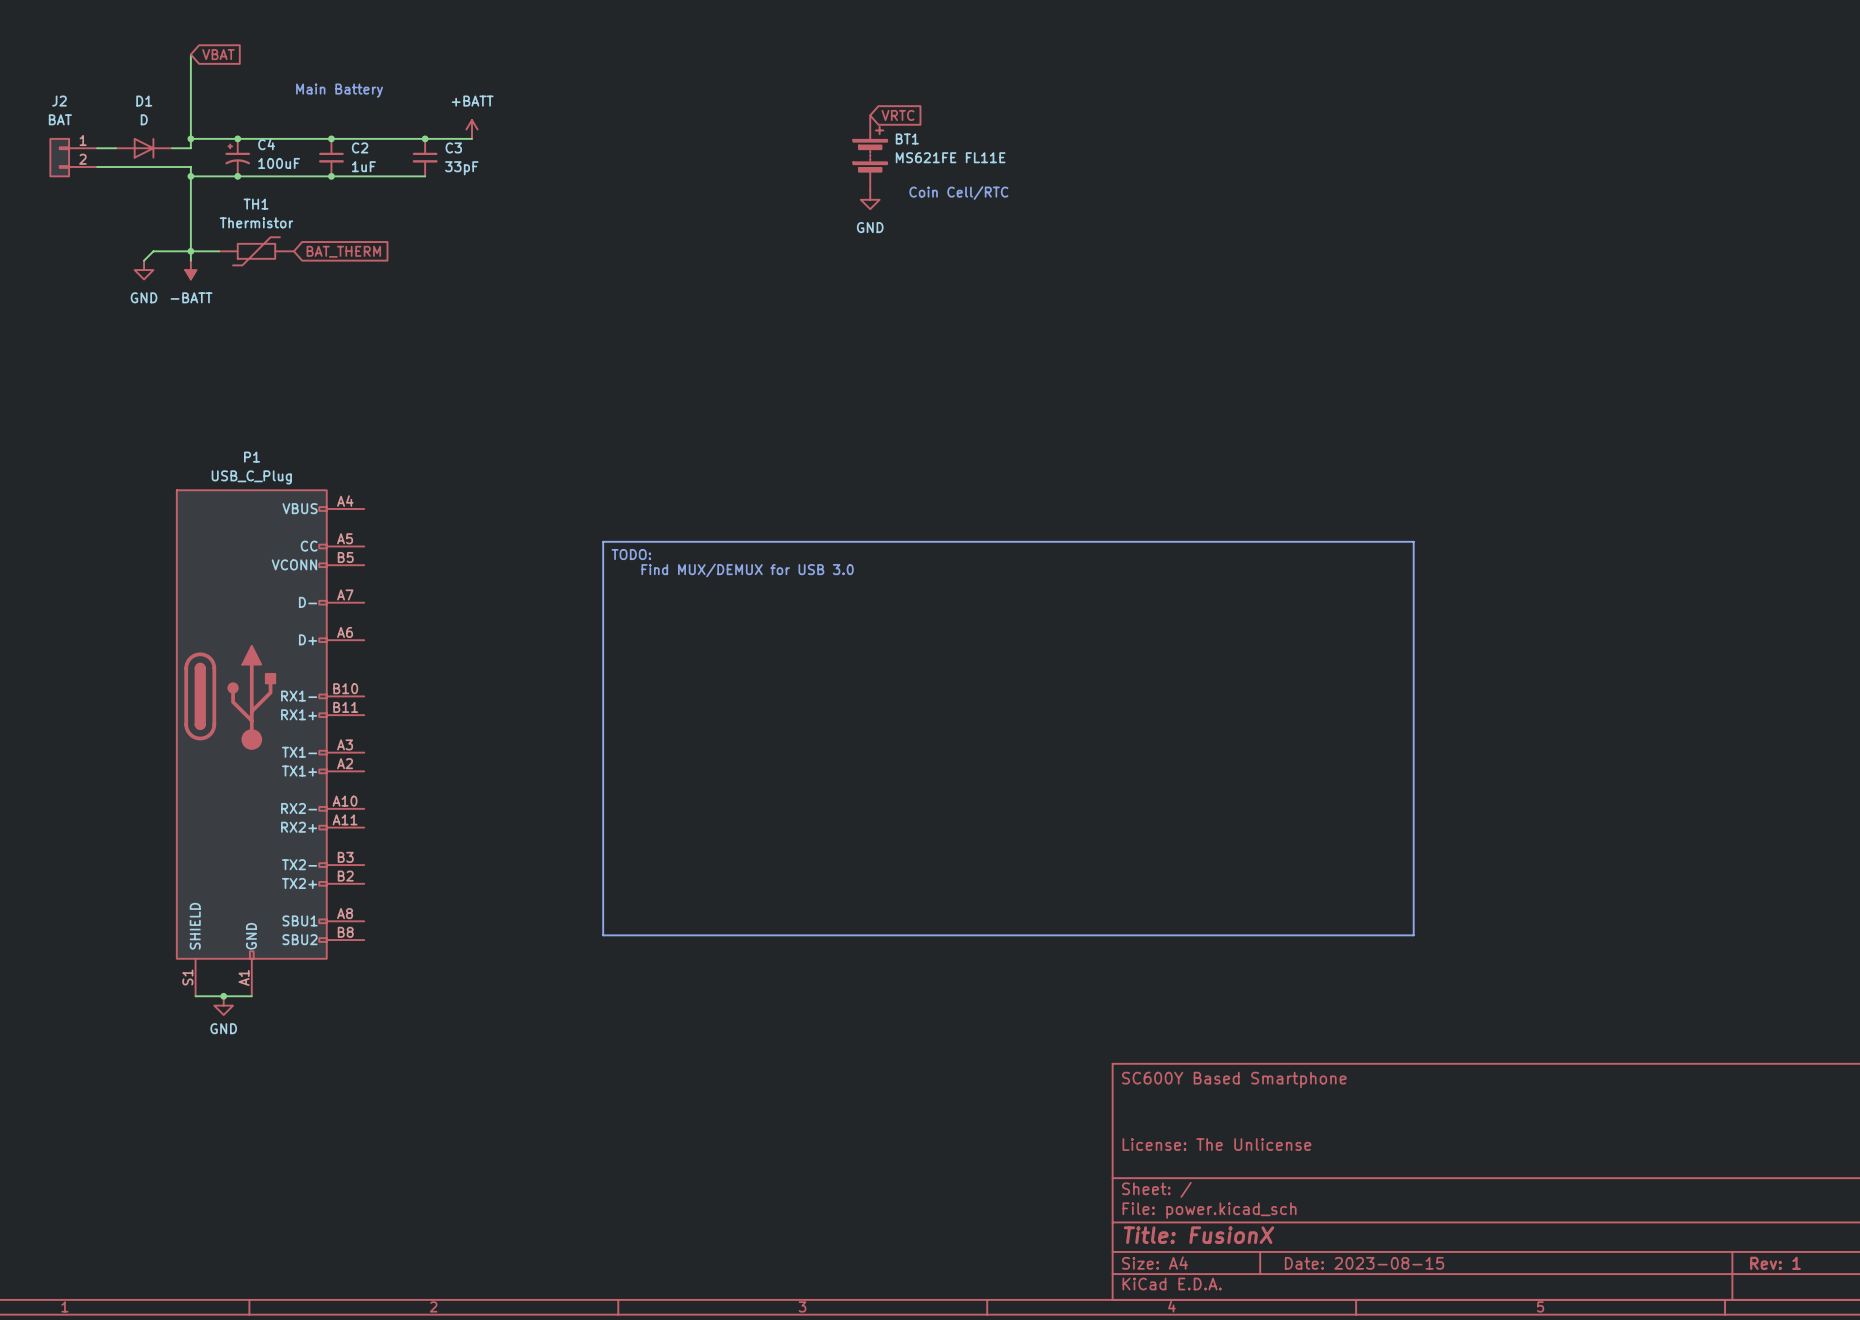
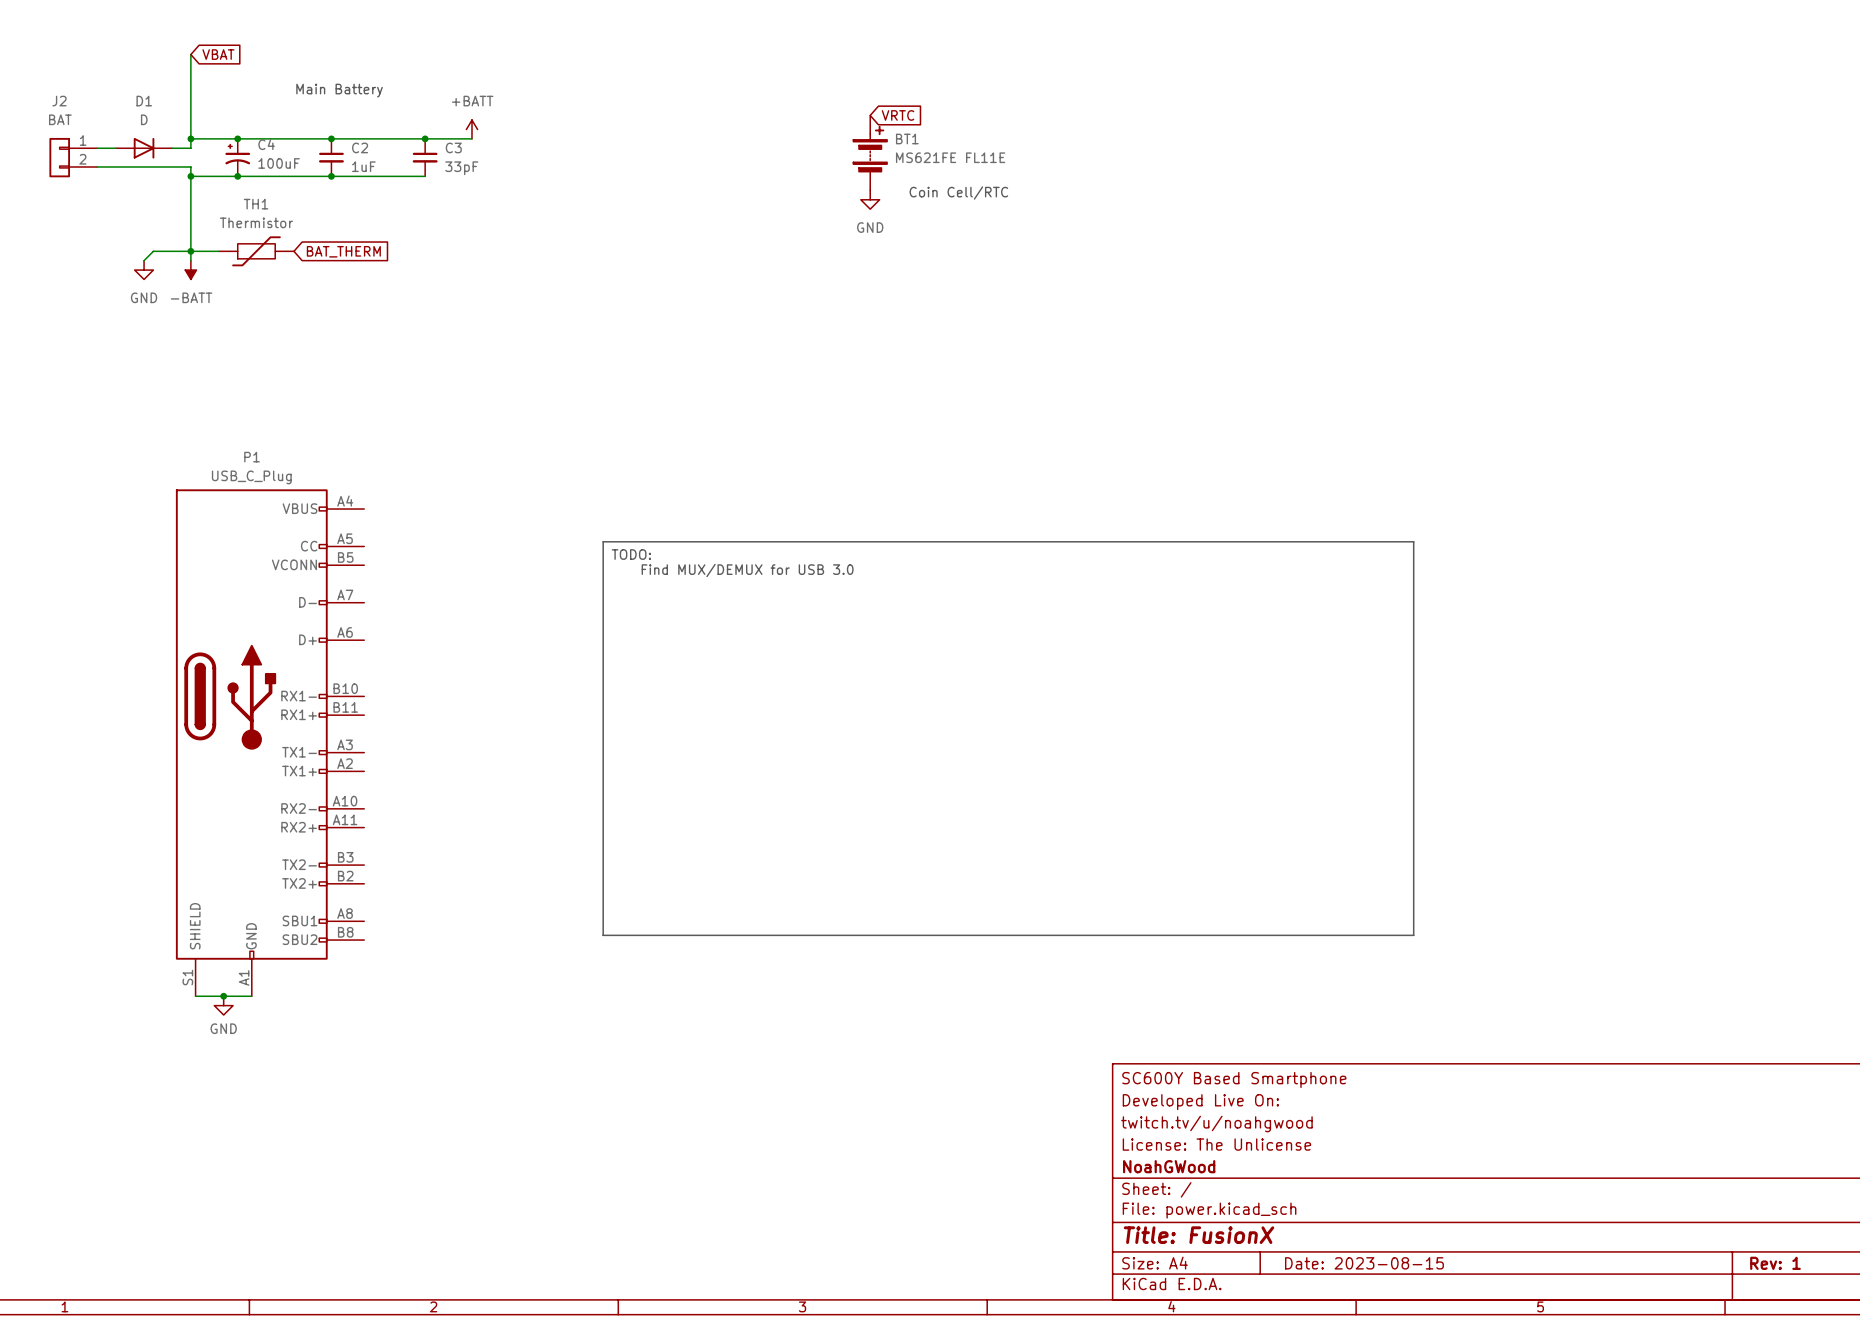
title block: none -> Developed Live On: (1200, 1102)
title block: none -> twitch.tv/u/noahgwood (1216, 1123)
title block: none -> NoahGWood (1169, 1166)

